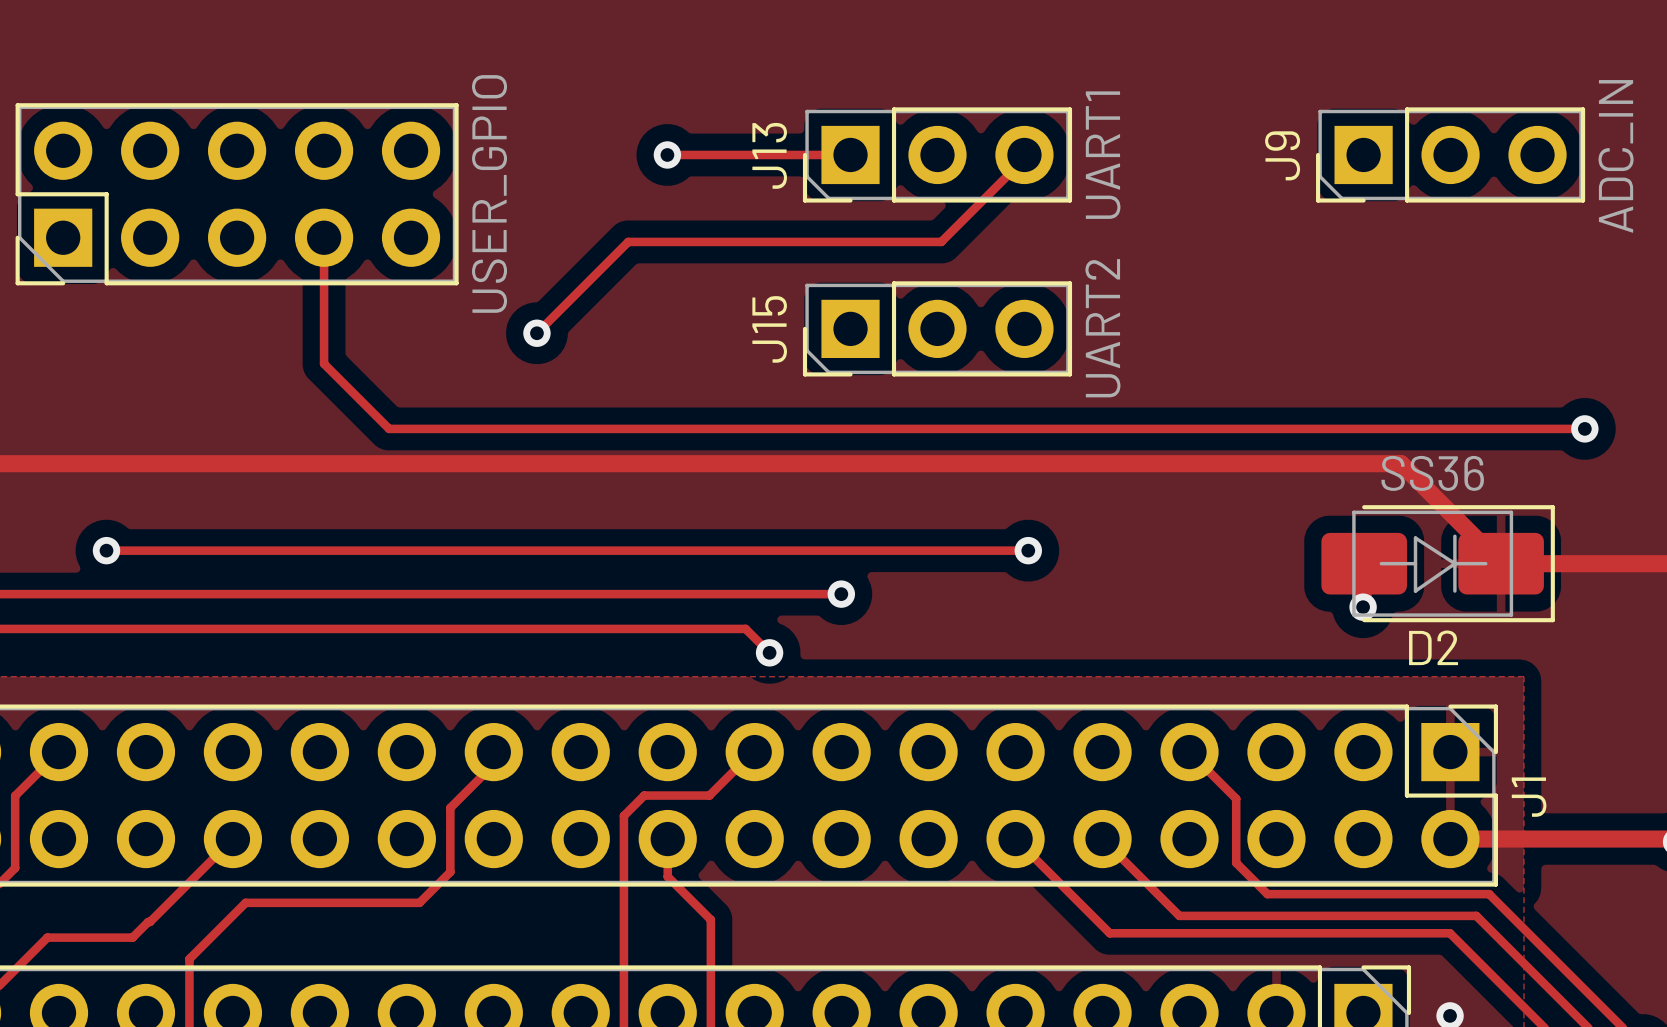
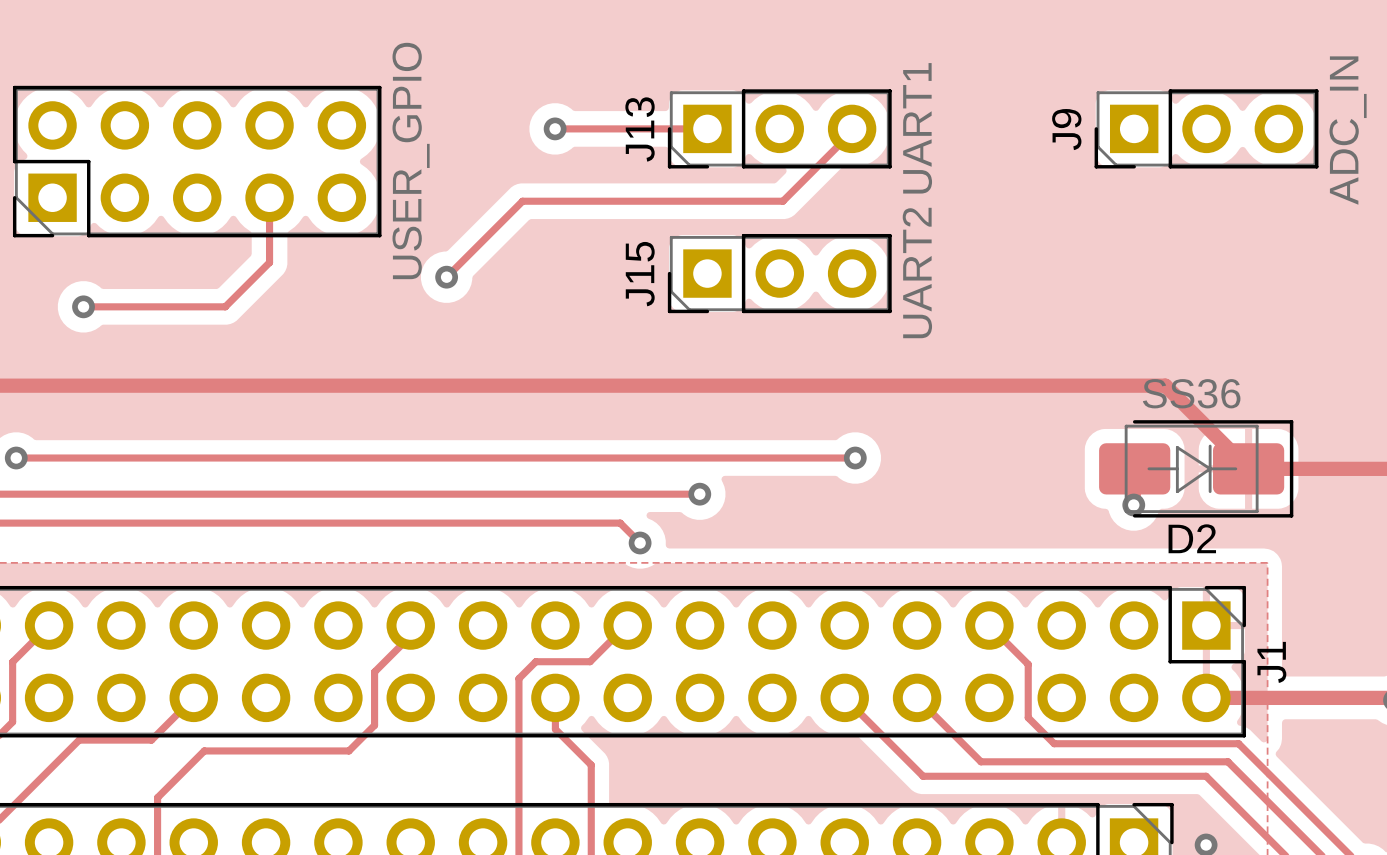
track: (324, 315) (324, 363) (389, 428) (1584, 428) -> (269, 262) (225, 306) (83, 306)
via: none -> (83, 306)
via: (1584, 428) -> none
track: none -> (16, 458) (88, 458)
via position: (106, 550) -> (16, 458)
track: (182, 889) (132, 937) (47, 937) -> (151, 740) (79, 740) (39, 779)

